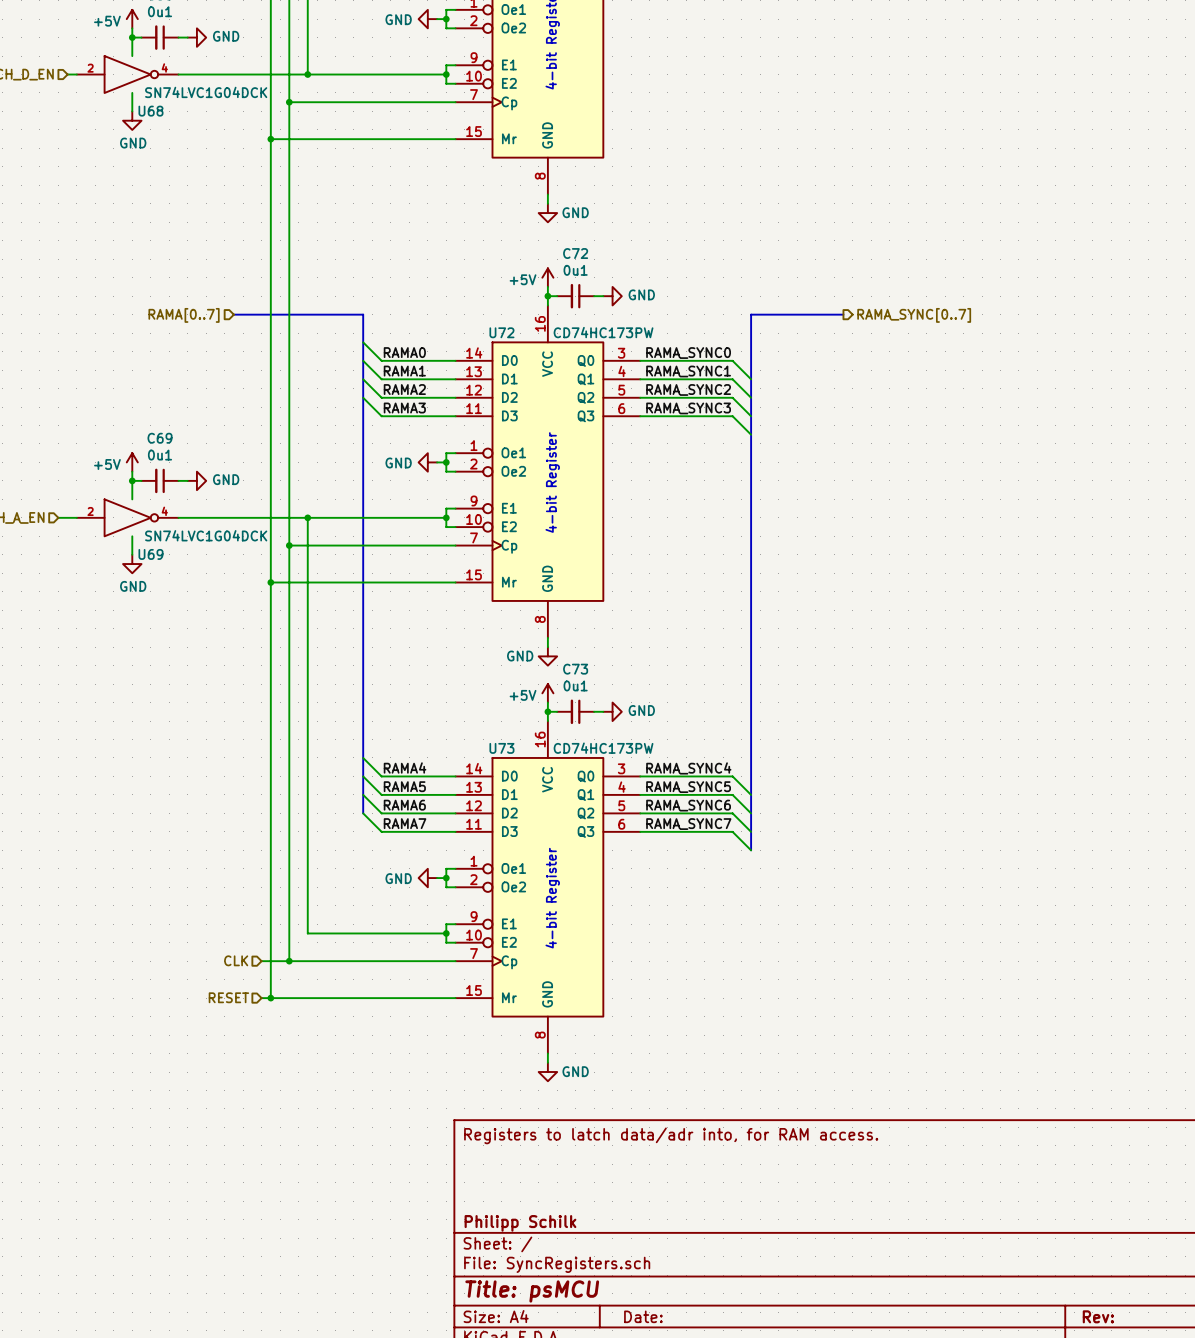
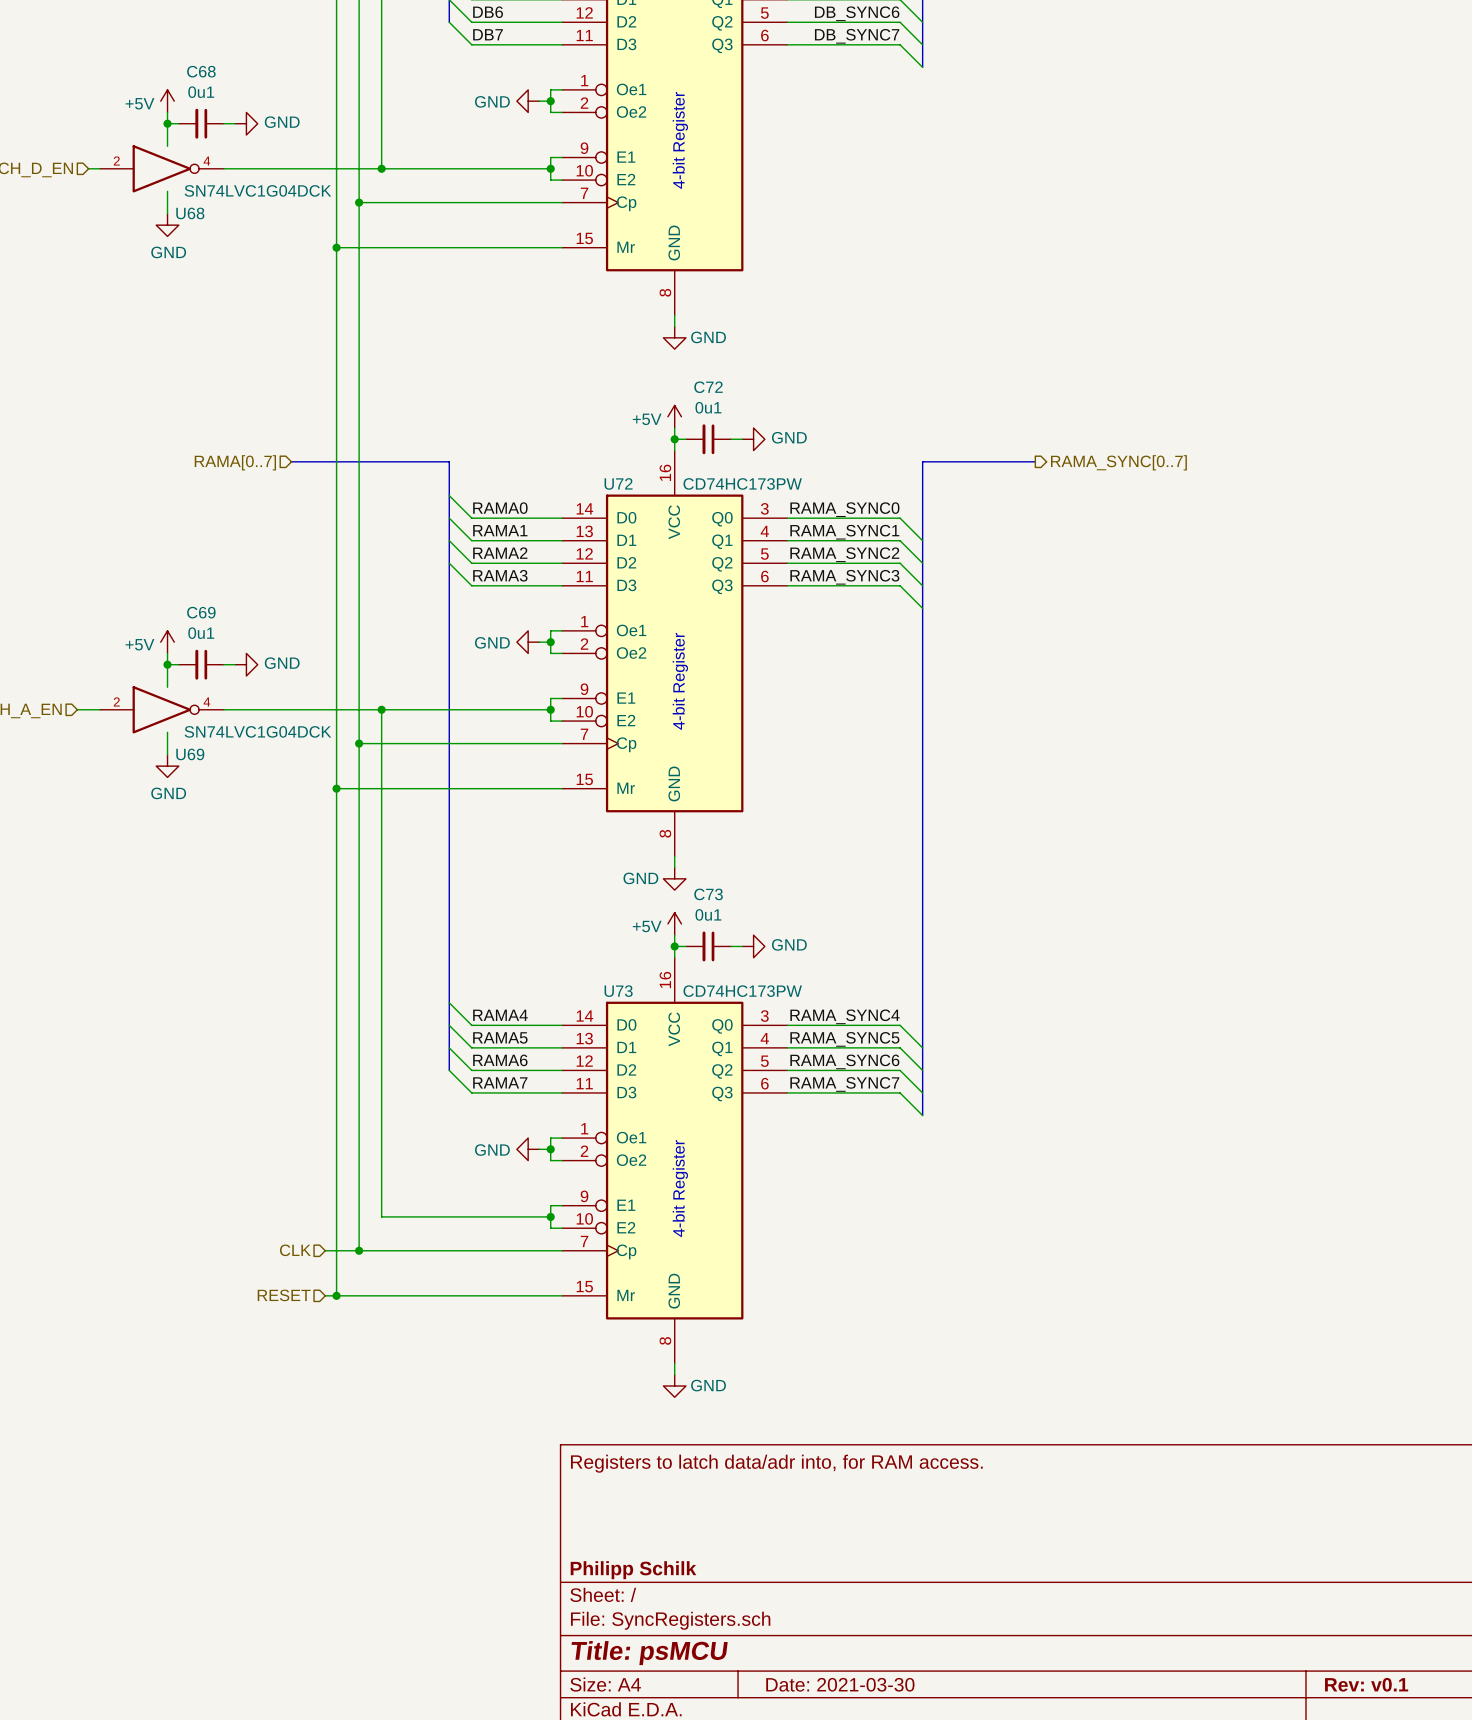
title block: Date: (643, 1316) -> Date: 2021-03-30 (840, 1684)
title block: Rev: (1098, 1316) -> Rev: v0.1 (1366, 1684)

